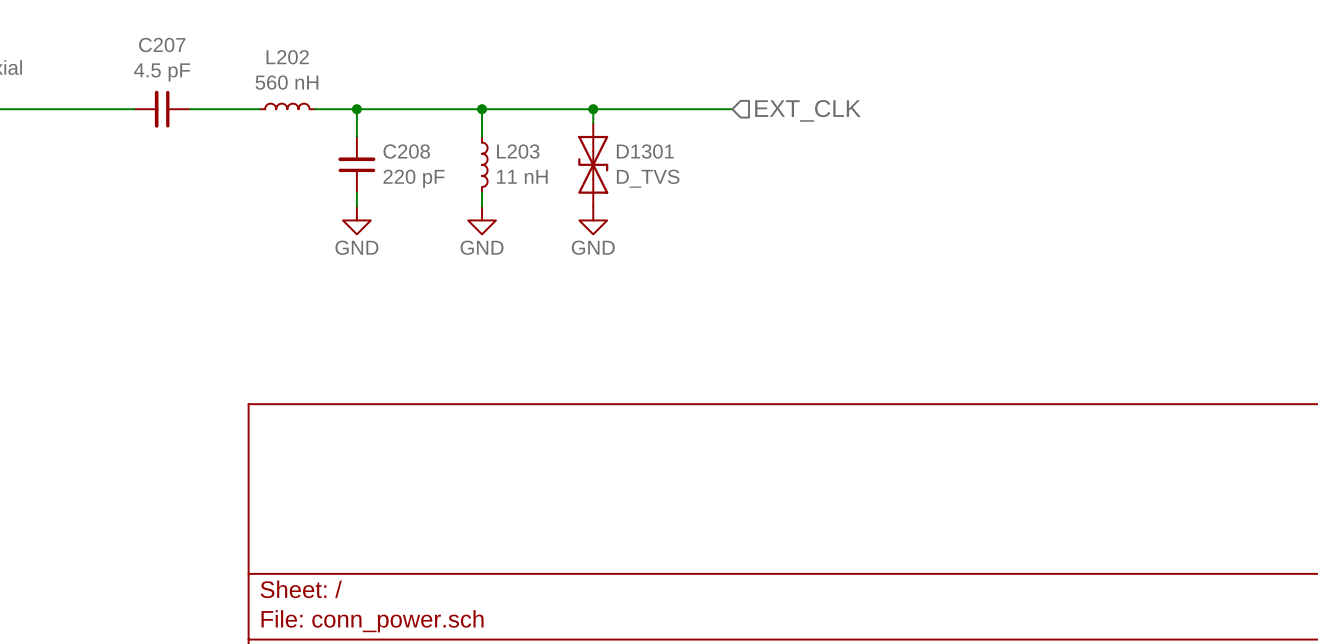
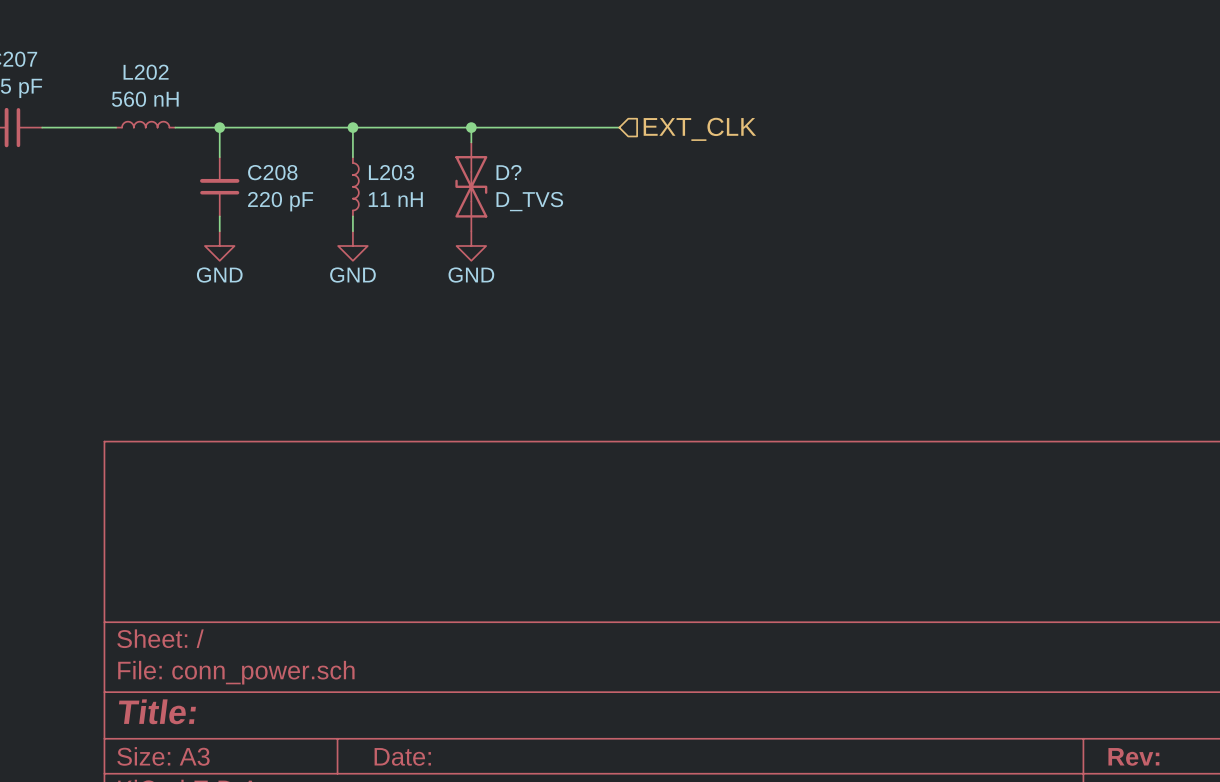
D1301 name: D1301 (645, 151) -> D? (508, 172)

